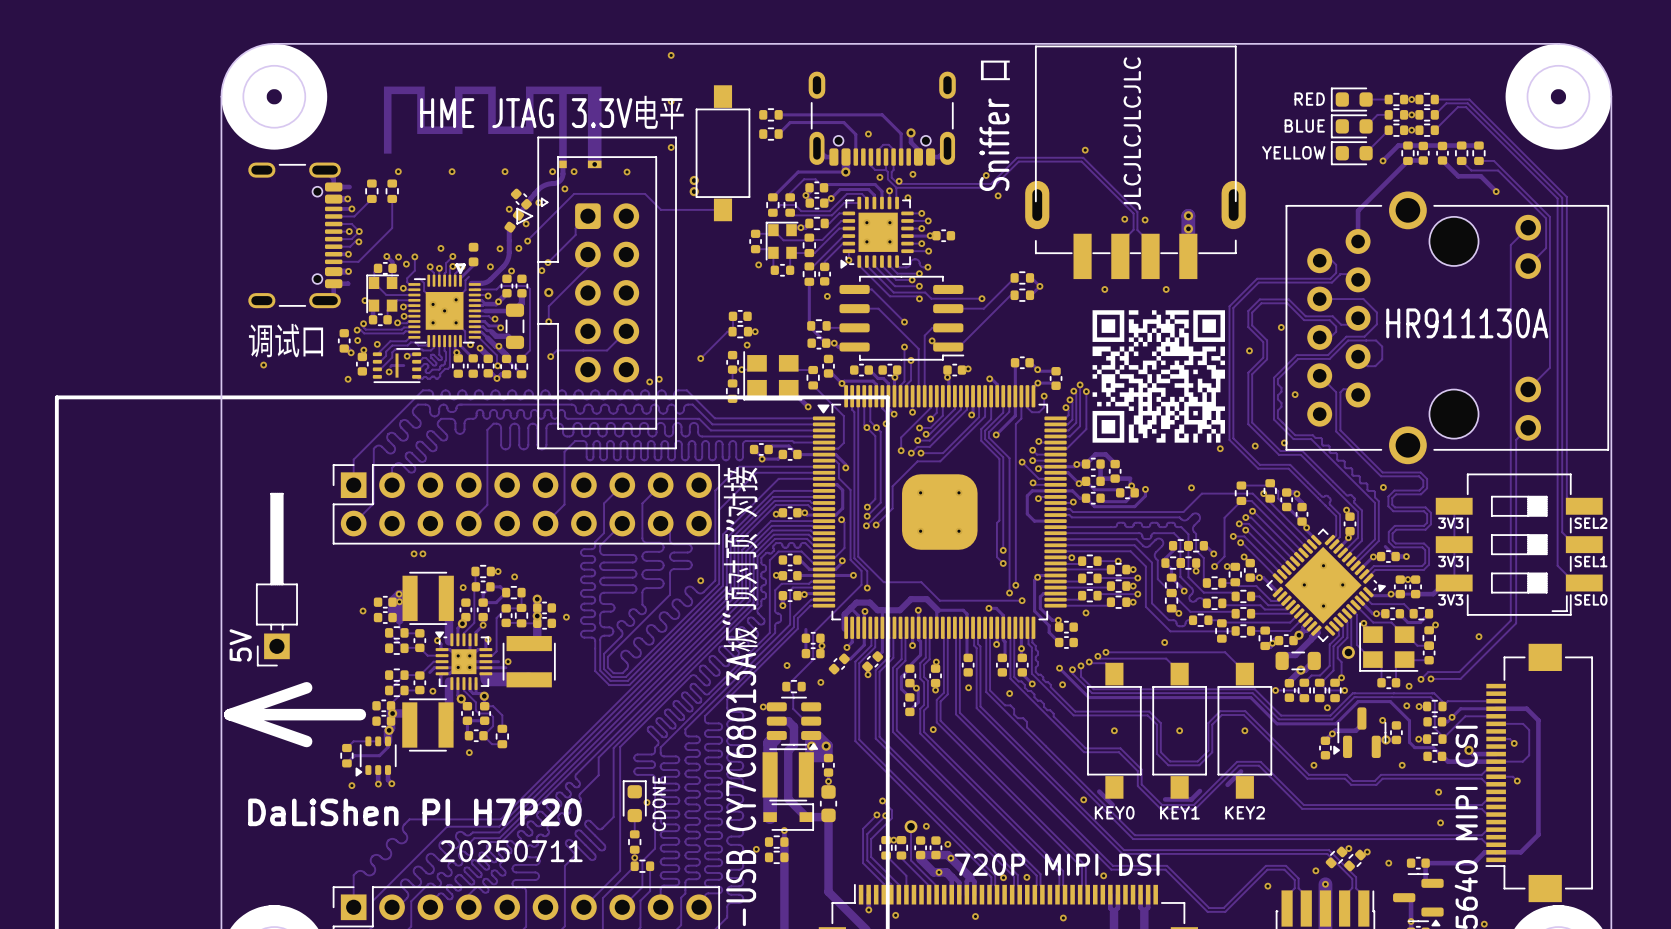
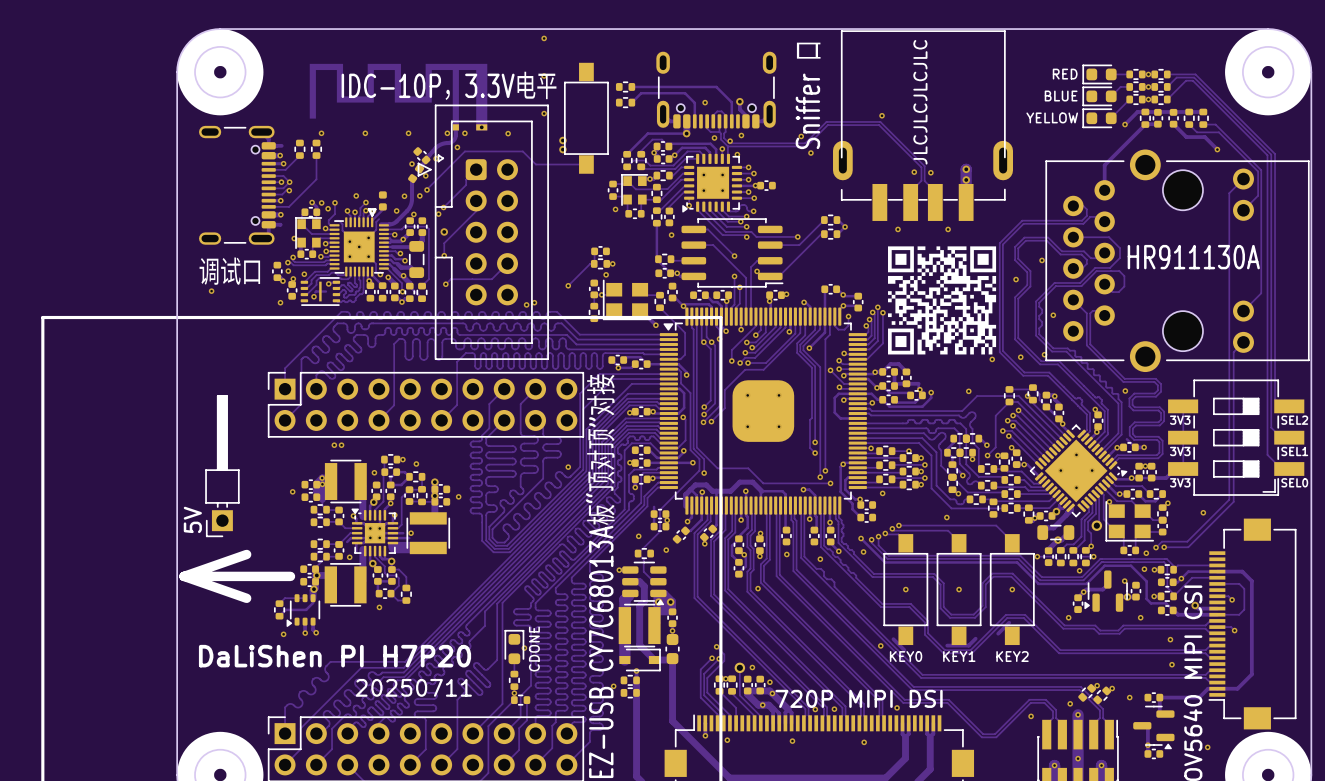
text: HME JTAG 3.3V电平 (552, 112) -> IDC-10P，3.3V电平 (449, 85)

